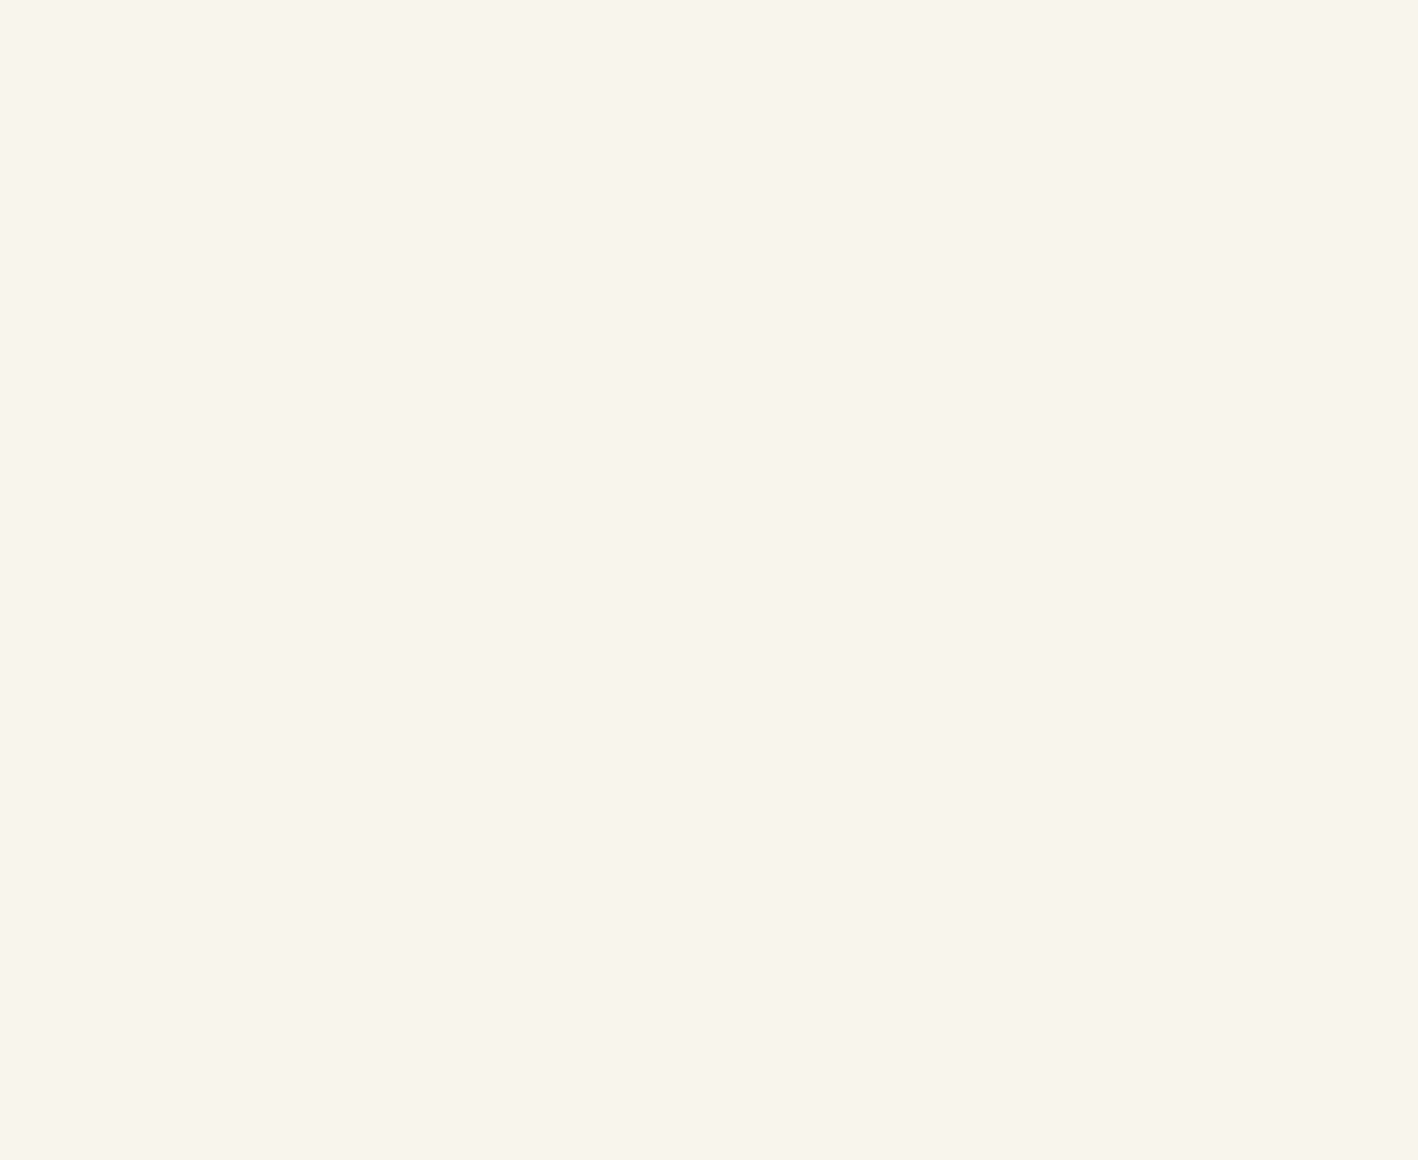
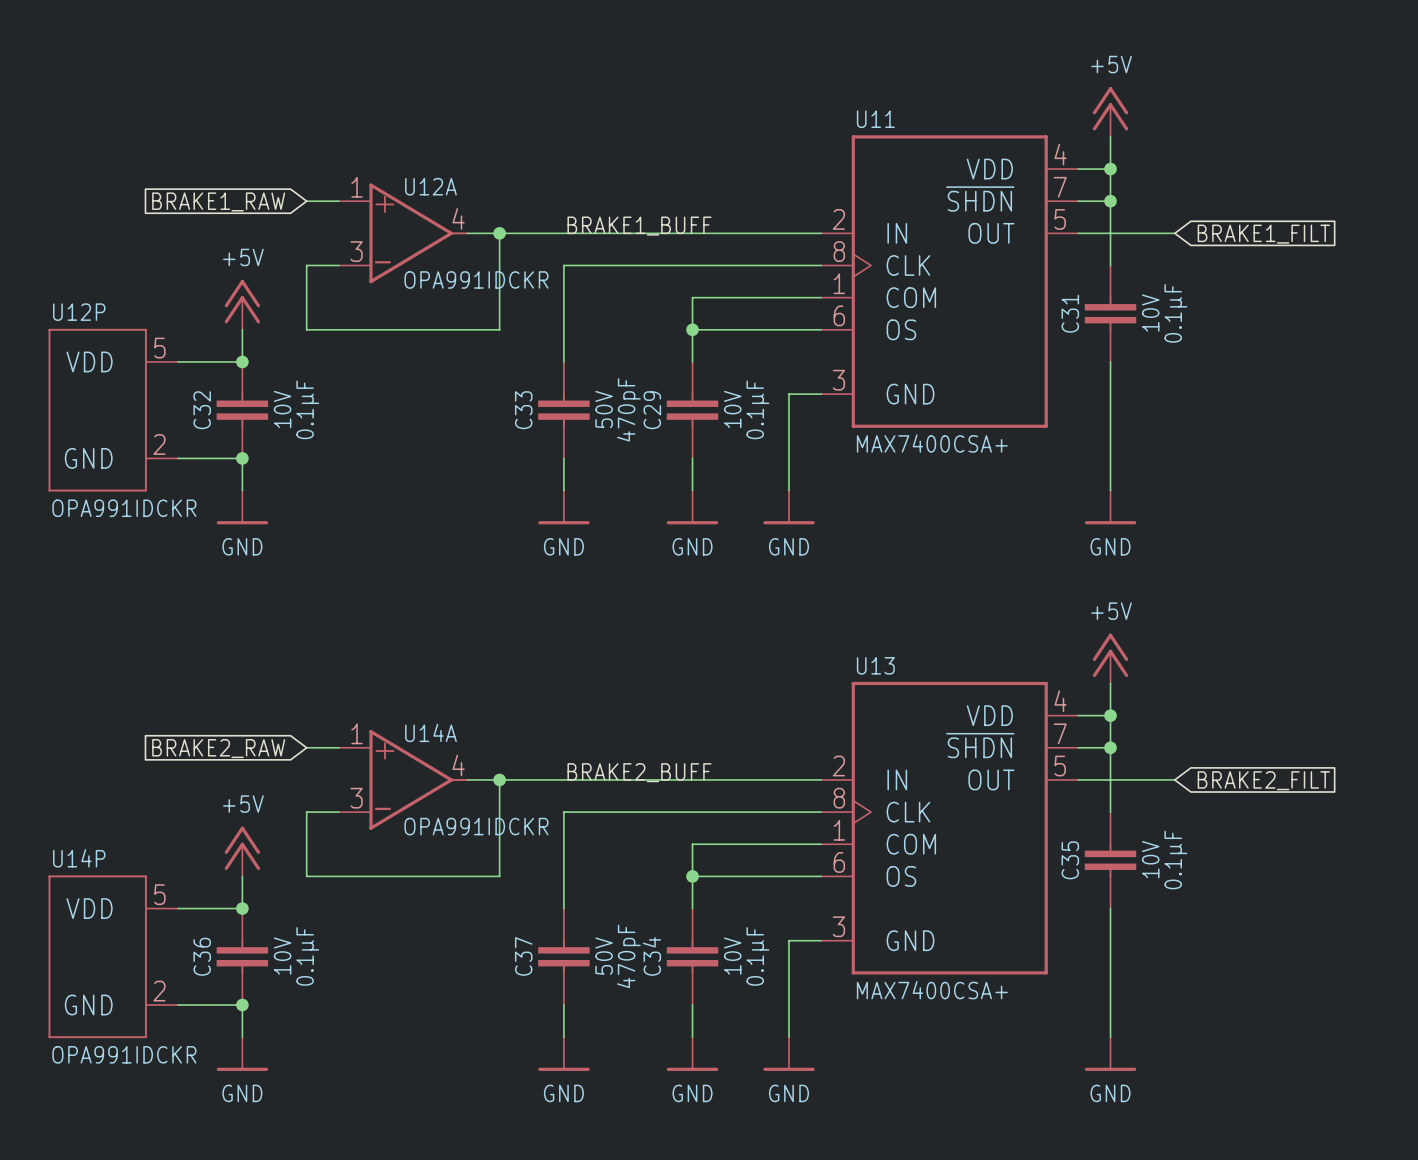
power symbol: none -> +5V (1110, 111)
wire: none -> (1110, 136) (1110, 265)
wire: none -> (1078, 169) (1110, 169)
junction: none -> (1110, 169)
global label: none -> BRAKE1_RAW (218, 201)
wire: none -> (306, 201) (338, 201)
wire: none -> (1078, 201) (1110, 201)
junction: none -> (1110, 201)
label: none -> BRAKE1_BUFF (639, 226)
U12A: none -> (403, 233)
wire: none -> (467, 233) (821, 233)
wire: none -> (499, 233) (499, 329) (306, 329) (306, 265) (338, 265)
junction: none -> (499, 233)
wire: none -> (1078, 233) (1174, 233)
global label: none -> BRAKE1_FILT (1263, 234)
wire: none -> (821, 265) (563, 265) (563, 361)
U11: none -> (949, 281)
wire: none -> (821, 297) (692, 297) (692, 361)
power symbol: none -> +5V (242, 304)
C31: none -> (1110, 313)
wire: none -> (242, 329) (242, 361) (178, 361)
wire: none -> (692, 329) (821, 329)
junction: none -> (692, 329)
junction: none -> (242, 361)
wire: none -> (1110, 361) (1110, 490)
wire: none -> (821, 394) (788, 394) (788, 490)
U12P: none -> (113, 410)
C32: none -> (242, 410)
C33: none -> (563, 410)
C29: none -> (692, 410)
wire: none -> (178, 458) (242, 458) (242, 490)
junction: none -> (242, 458)
wire: none -> (563, 458) (563, 490)
wire: none -> (692, 458) (692, 490)
power symbol: none -> GND (242, 507)
power symbol: none -> GND (563, 507)
power symbol: none -> GND (692, 507)
power symbol: none -> GND (788, 507)
power symbol: none -> GND (1110, 507)
power symbol: none -> +5V (1110, 658)
wire: none -> (1110, 683) (1110, 812)
wire: none -> (1078, 715) (1110, 715)
junction: none -> (1110, 715)
wire: none -> (306, 747) (338, 747)
wire: none -> (1078, 747) (1110, 747)
junction: none -> (1110, 747)
global label: none -> BRAKE2_RAW (218, 748)
label: none -> BRAKE2_BUFF (639, 772)
U14A: none -> (403, 779)
wire: none -> (467, 779) (821, 779)
wire: none -> (499, 779) (499, 876) (306, 876) (306, 812) (338, 812)
junction: none -> (499, 779)
wire: none -> (1078, 779) (1174, 779)
global label: none -> BRAKE2_FILT (1263, 780)
wire: none -> (821, 812) (563, 812) (563, 908)
U13: none -> (949, 828)
wire: none -> (821, 844) (692, 844) (692, 908)
power symbol: none -> +5V (242, 851)
C35: none -> (1110, 860)
wire: none -> (242, 876) (242, 908) (178, 908)
wire: none -> (692, 876) (821, 876)
junction: none -> (692, 876)
junction: none -> (242, 908)
wire: none -> (1110, 908) (1110, 1037)
wire: none -> (821, 940) (788, 940) (788, 1037)
U14P: none -> (113, 956)
C36: none -> (242, 956)
C37: none -> (563, 956)
C34: none -> (692, 956)
wire: none -> (178, 1005) (242, 1005) (242, 1037)
junction: none -> (242, 1005)
wire: none -> (563, 1005) (563, 1037)
wire: none -> (692, 1005) (692, 1037)
power symbol: none -> GND (242, 1054)
power symbol: none -> GND (563, 1054)
power symbol: none -> GND (692, 1054)
power symbol: none -> GND (788, 1054)
power symbol: none -> GND (1110, 1054)

